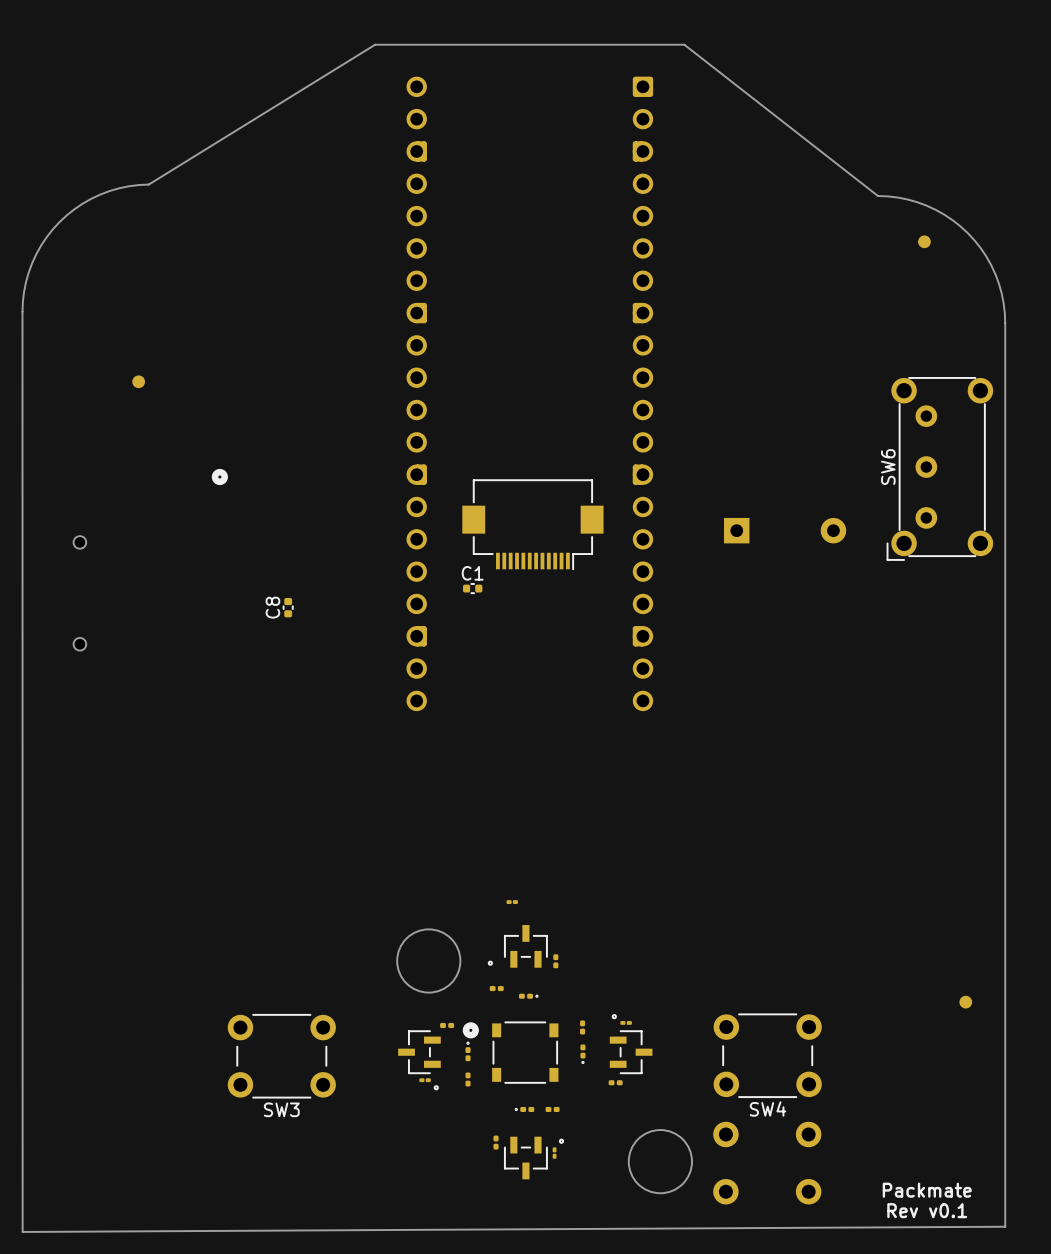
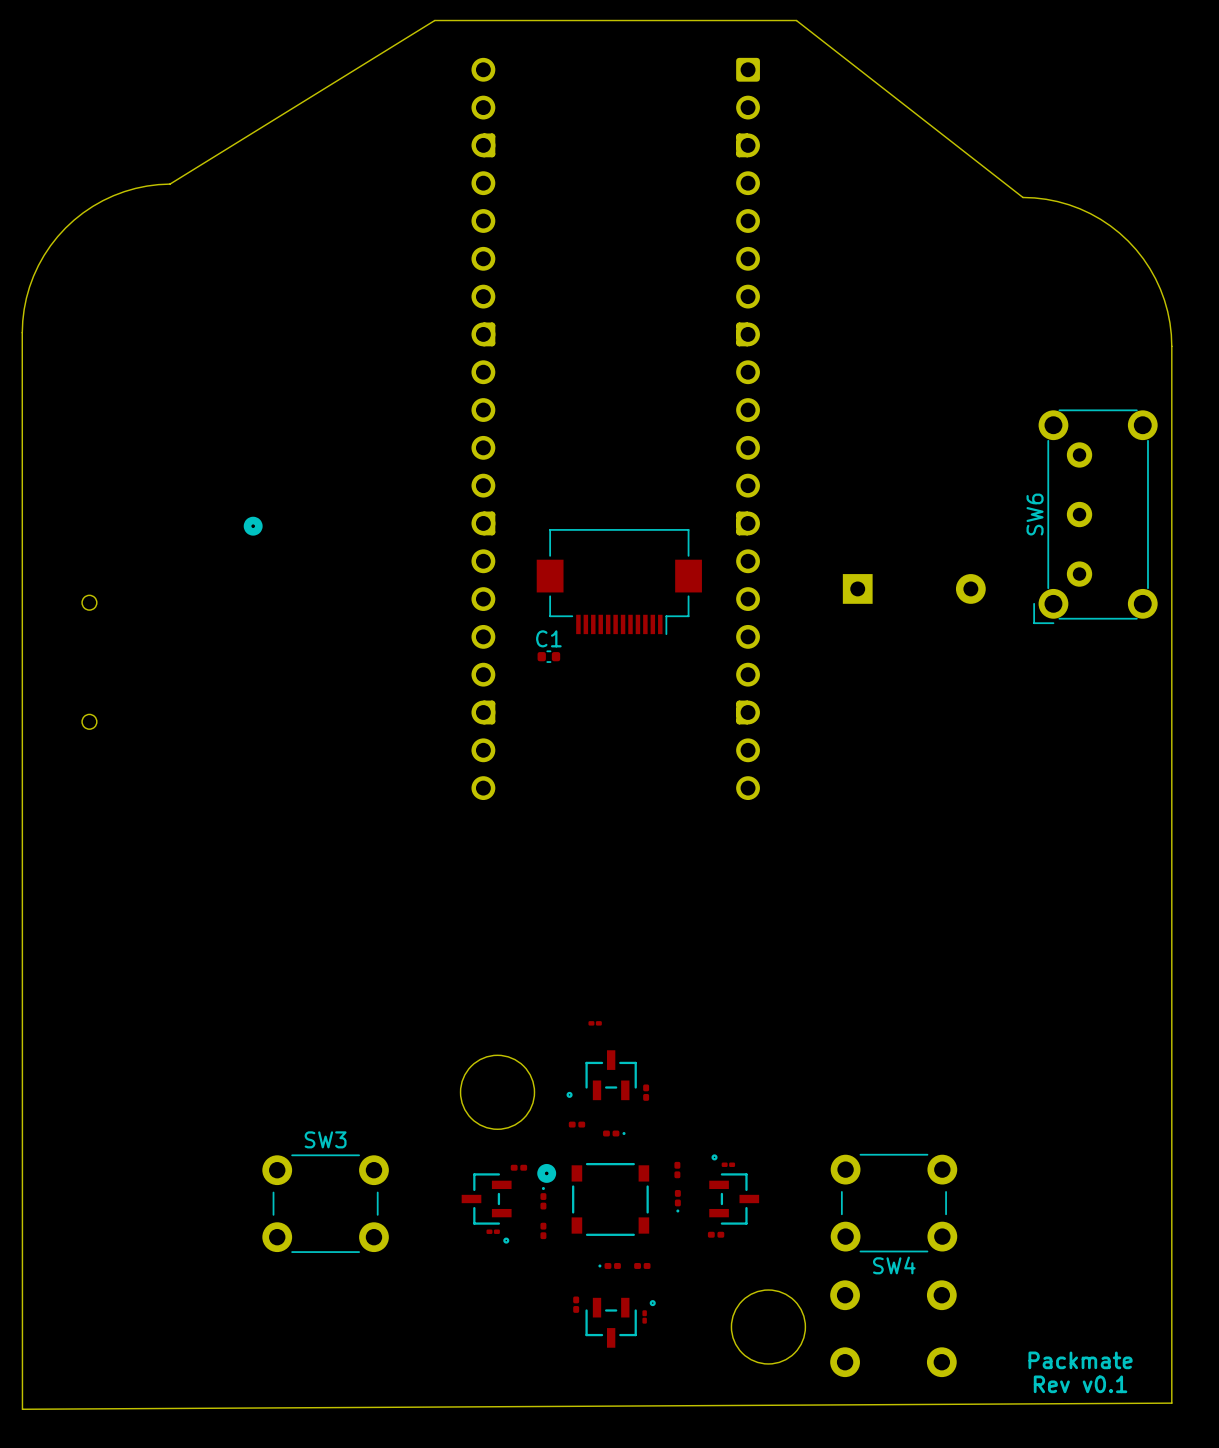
part: (924, 241) -> none
part: (138, 381) -> none
C8: (288, 607) -> none
part: (965, 1002) -> none
SW3 name position: SW3 (281, 1109) -> SW3 (325, 1139)

